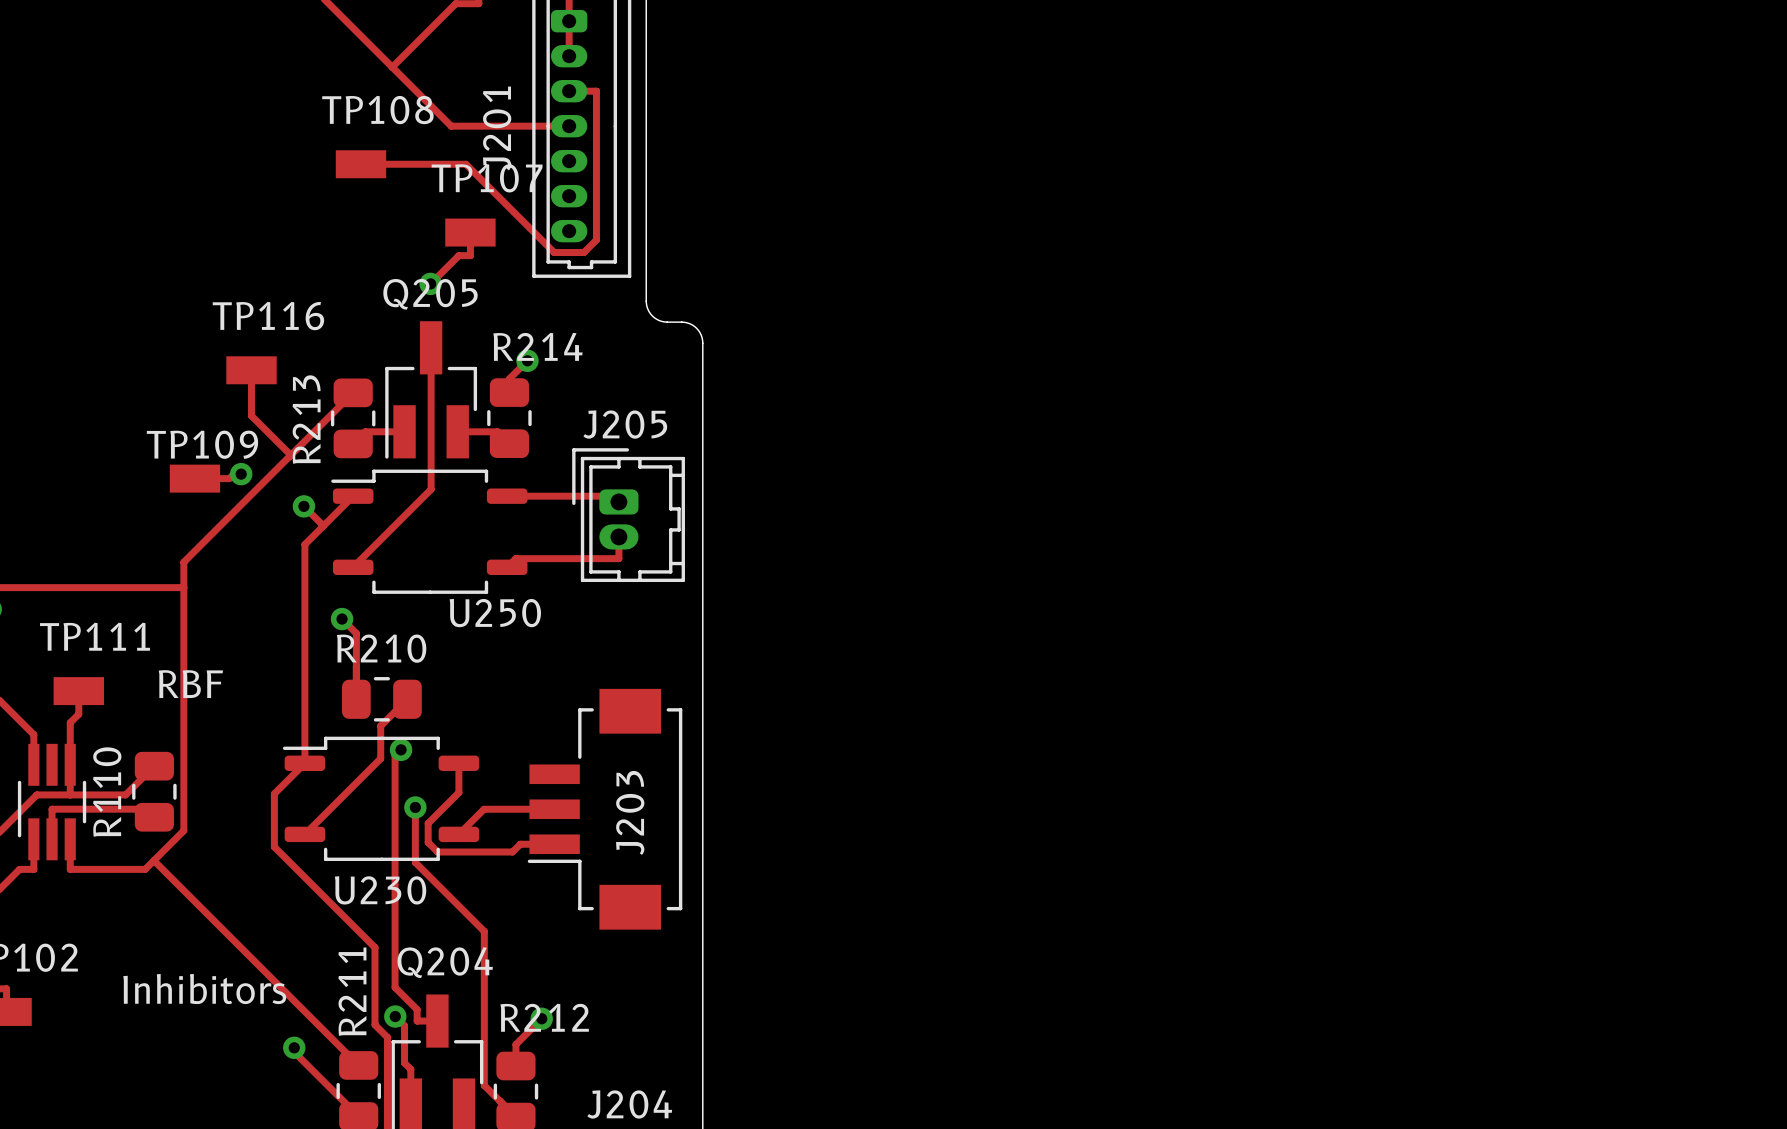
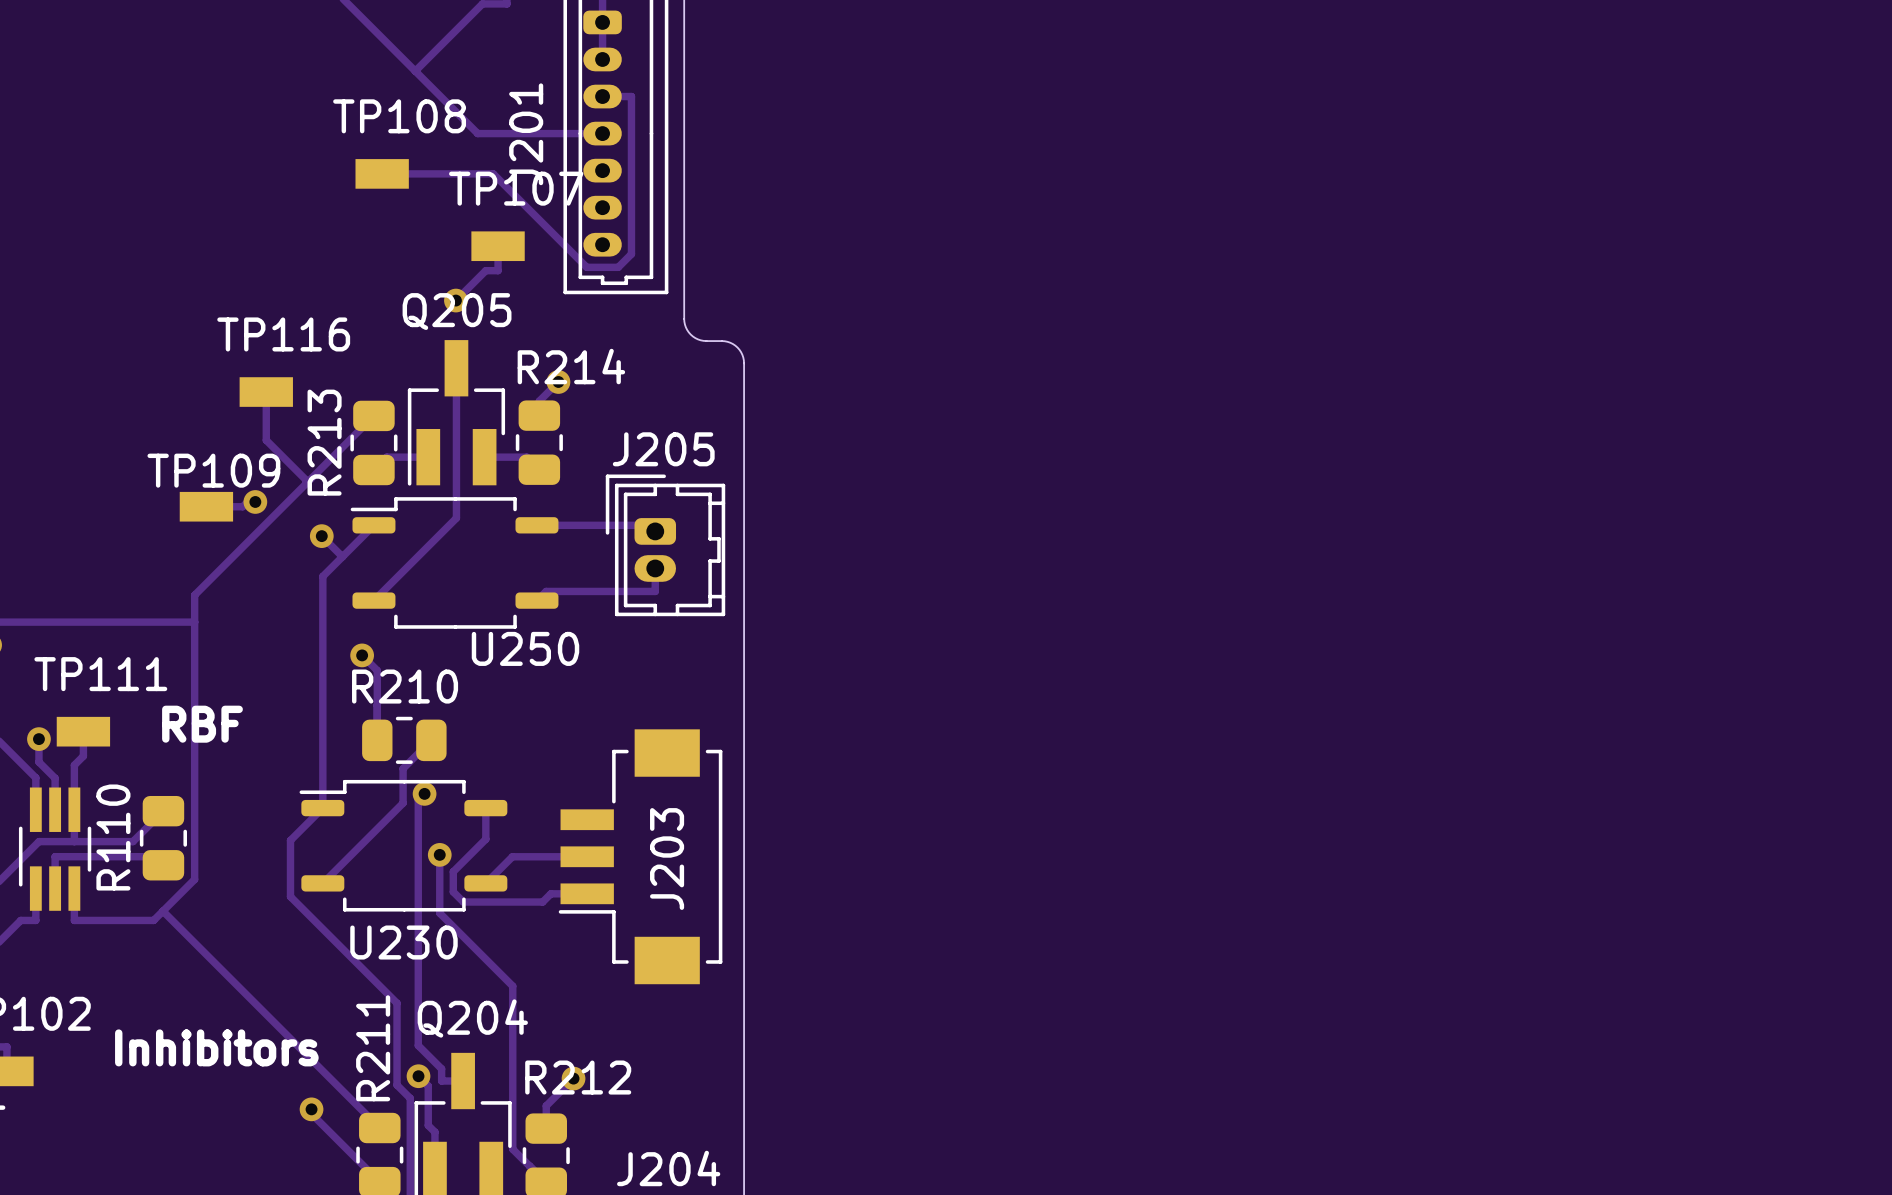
track: none -> (38, 739) (38, 762) (55, 778) (55, 809)
via: none -> (38, 739)

